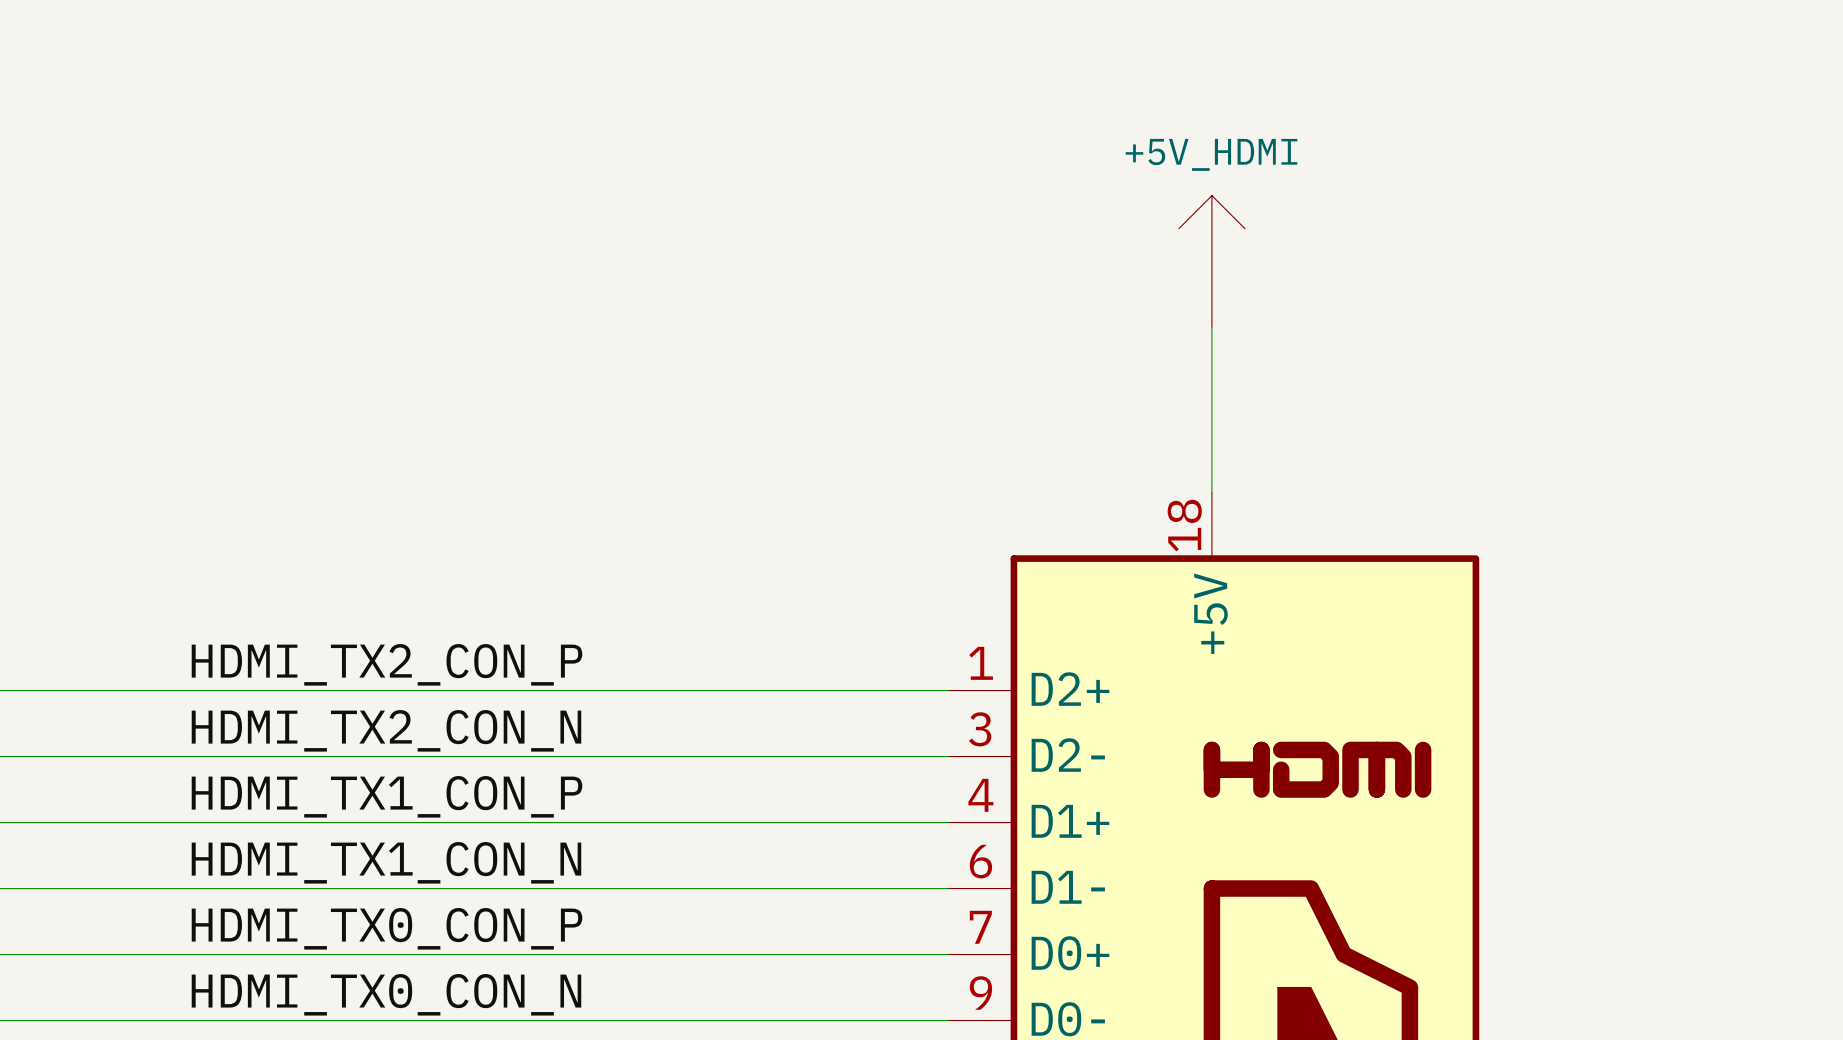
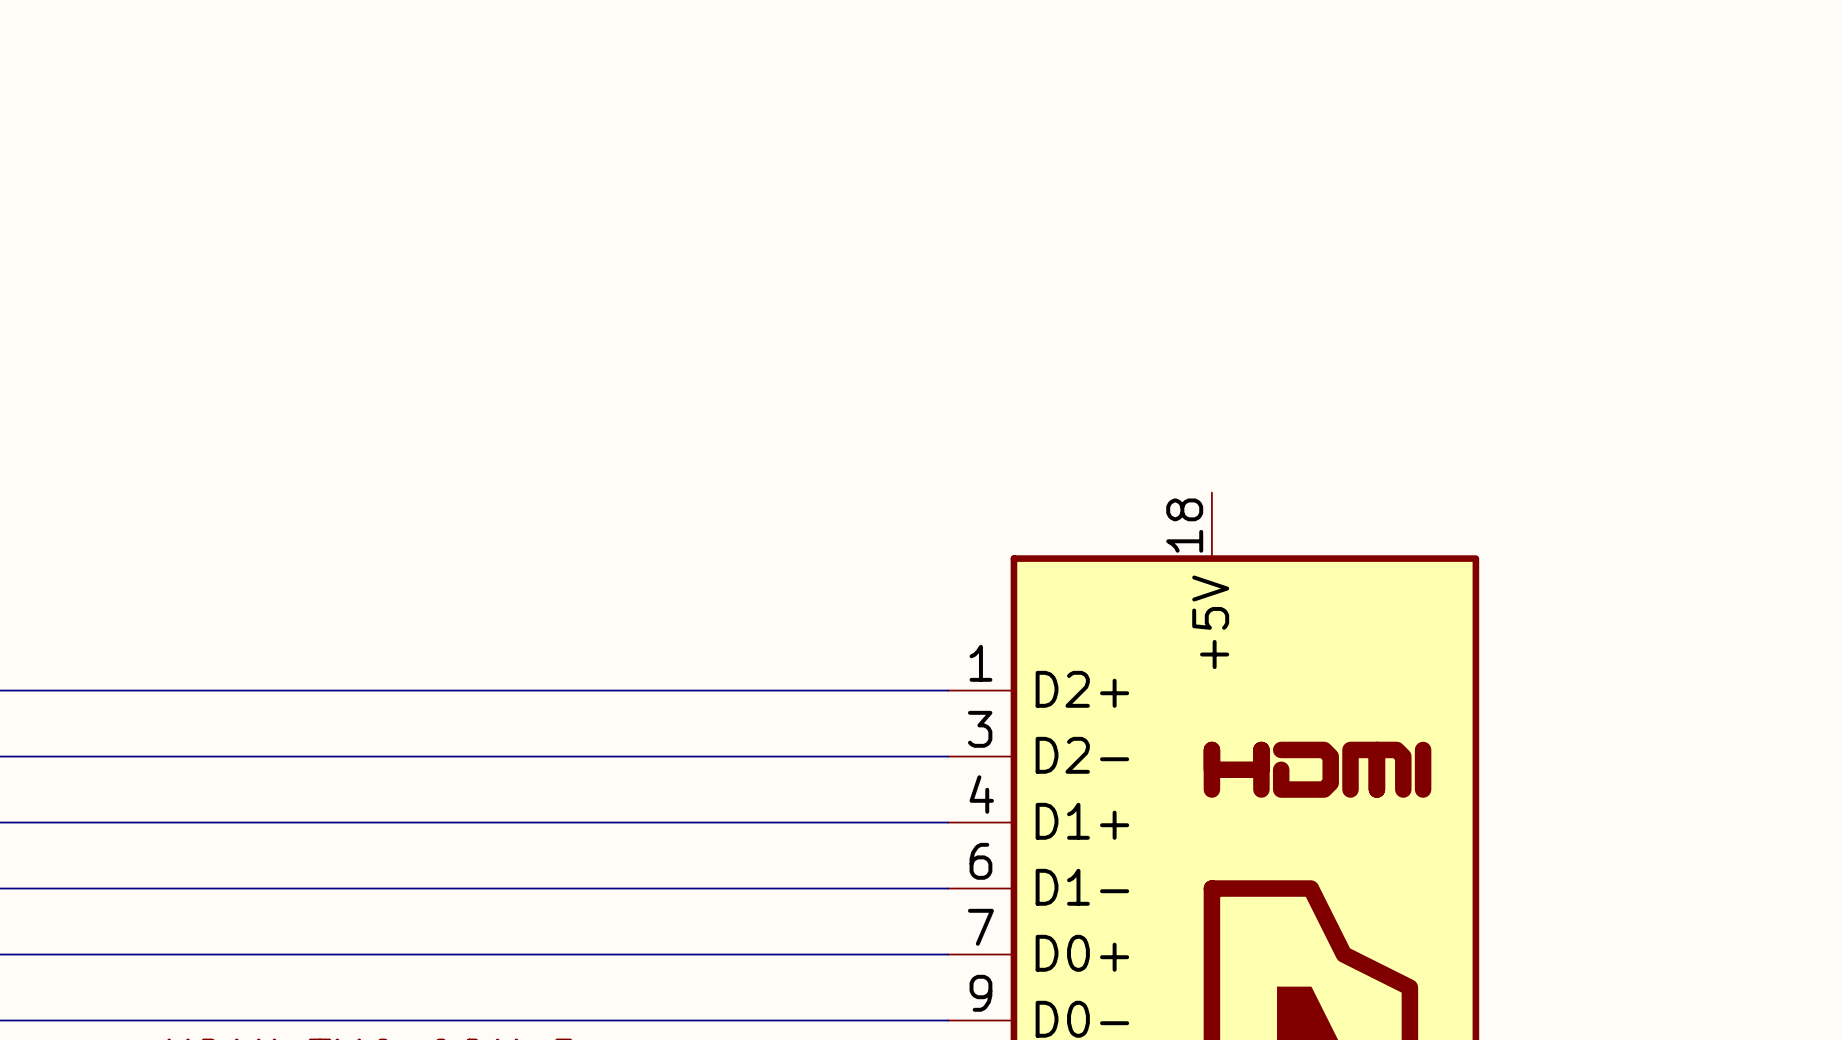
power symbol: +5V_HDMI (1211, 261) -> none
wire: (1211, 327) (1211, 492) -> none
label: HDMI_TX2_CON_P (387, 664) -> none
label: HDMI_TX2_CON_N (386, 730) -> none
label: HDMI_TX1_CON_P (387, 796) -> none
label: HDMI_TX1_CON_N (386, 862) -> none
label: HDMI_TX0_CON_P (387, 928) -> none
label: HDMI_TX0_CON_N (386, 994) -> none

